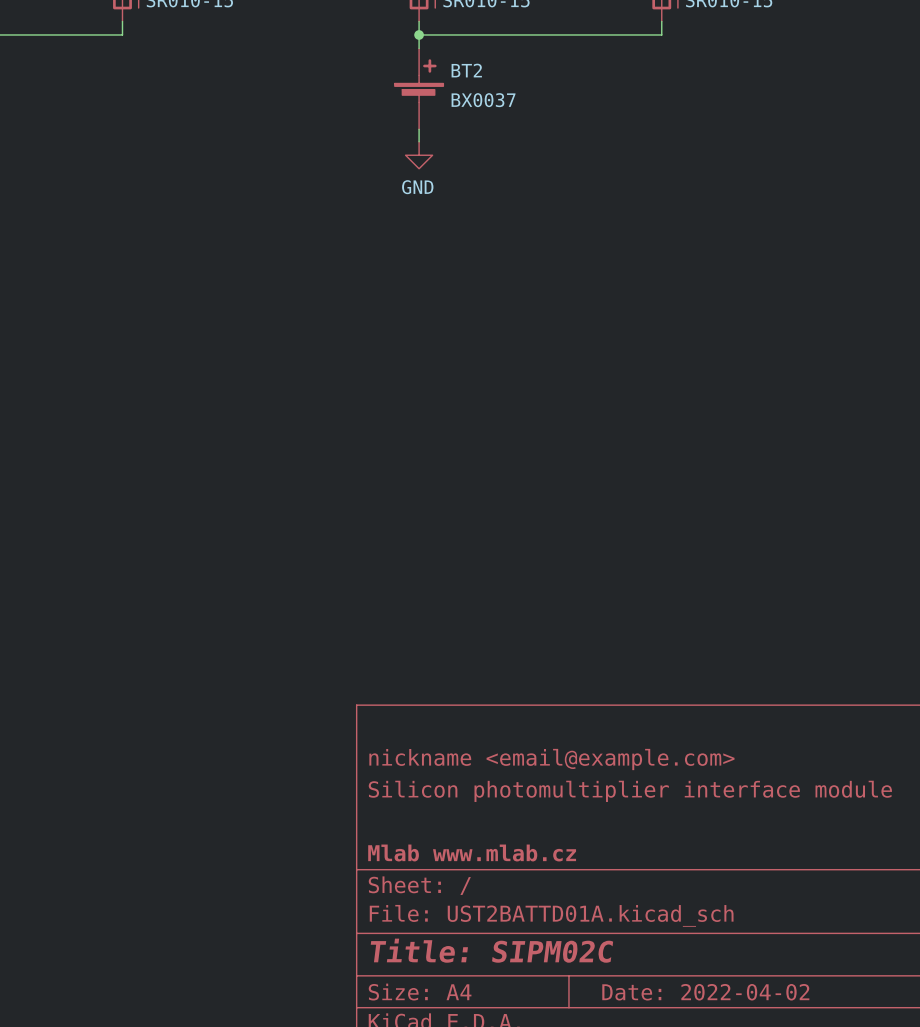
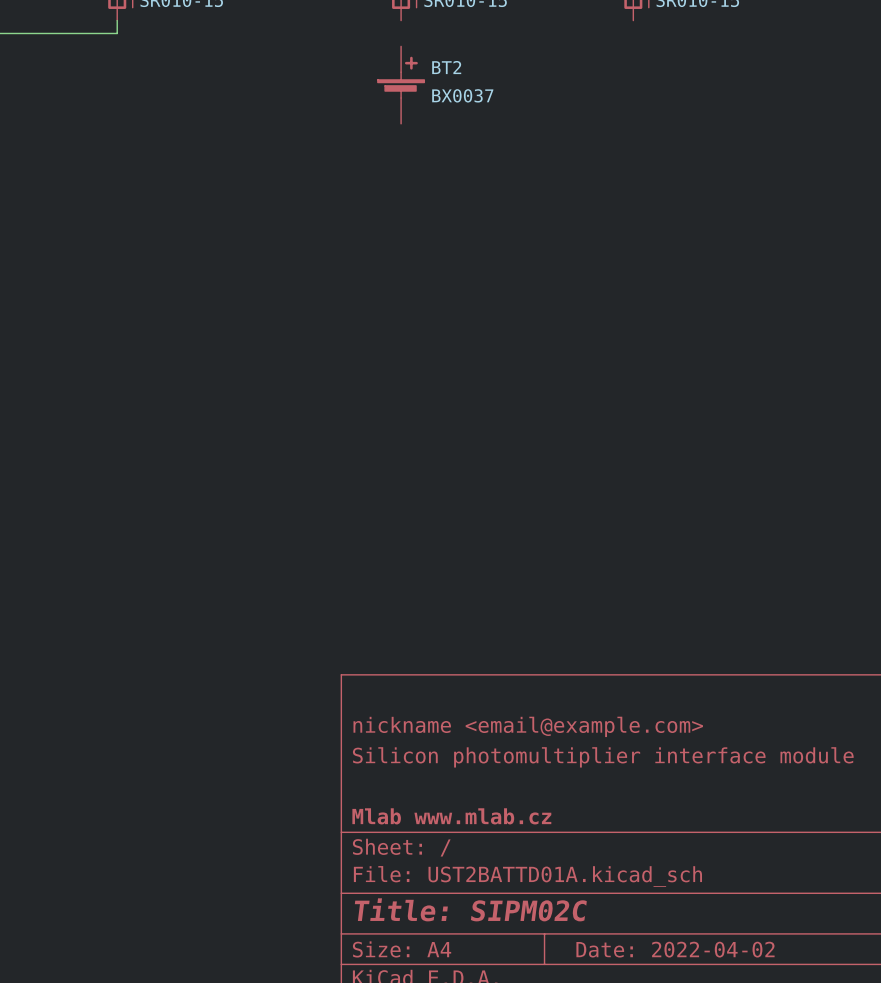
wire: (419, 21) (419, 48) -> none
wire: (661, 21) (661, 34) (419, 34) -> none
junction: (419, 34) -> none
wire: (419, 129) (419, 141) -> none
power symbol: GND (419, 155) -> none

